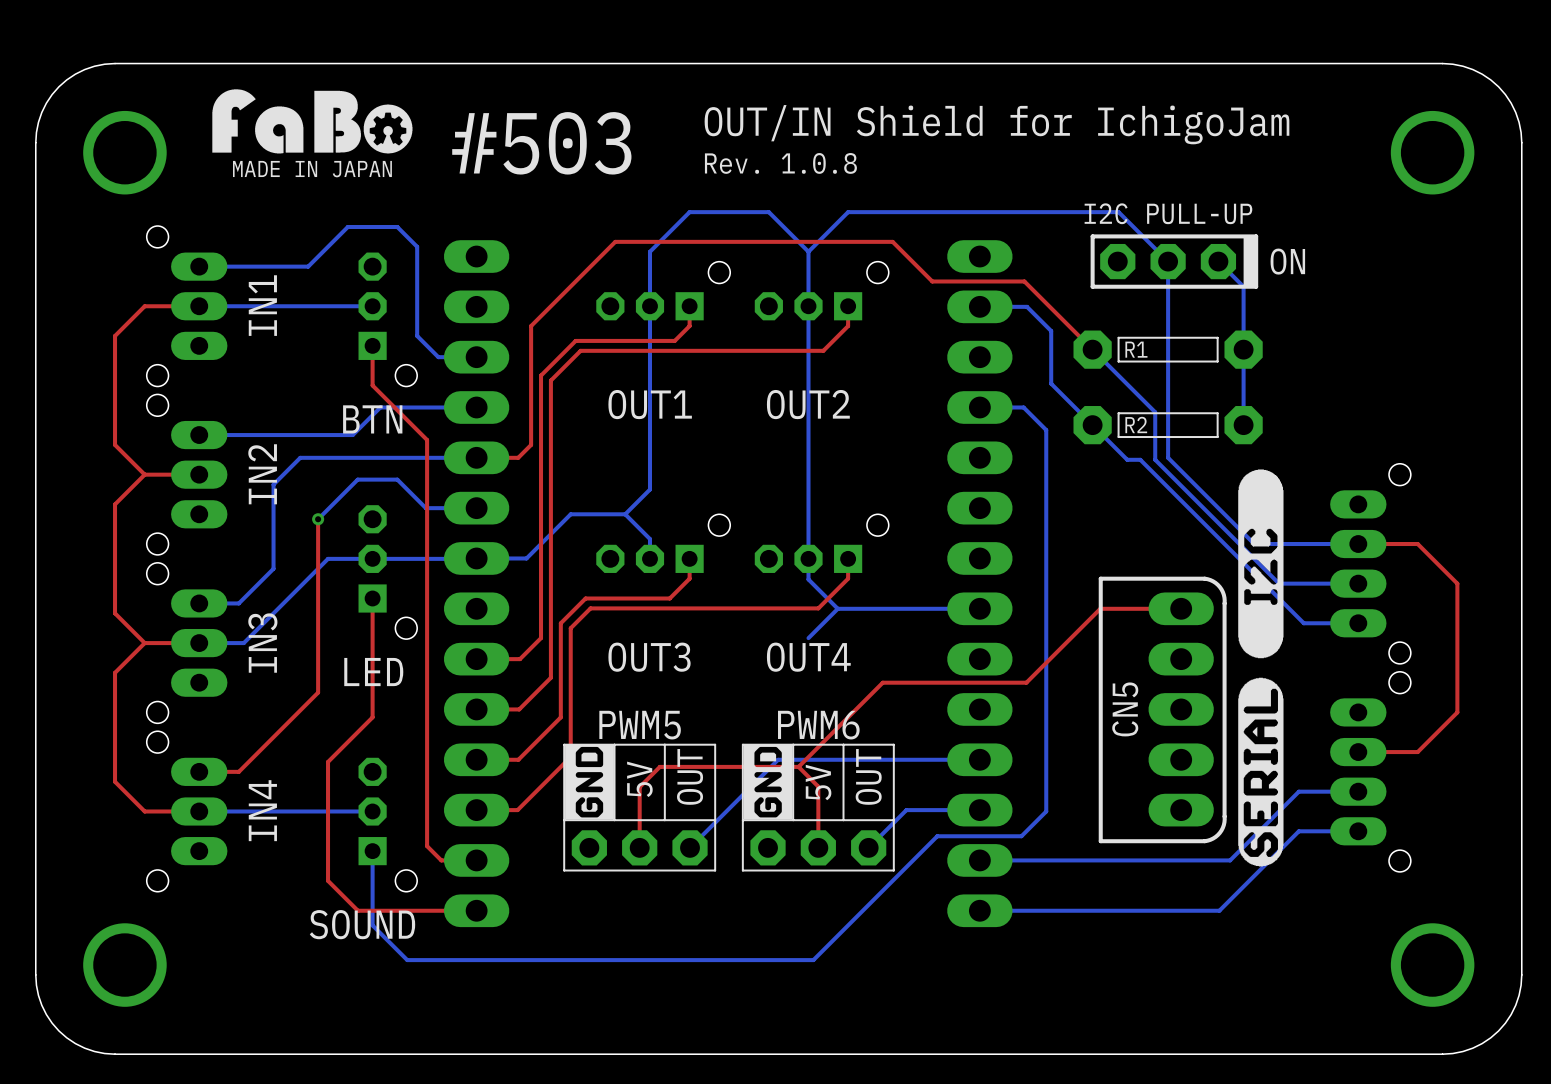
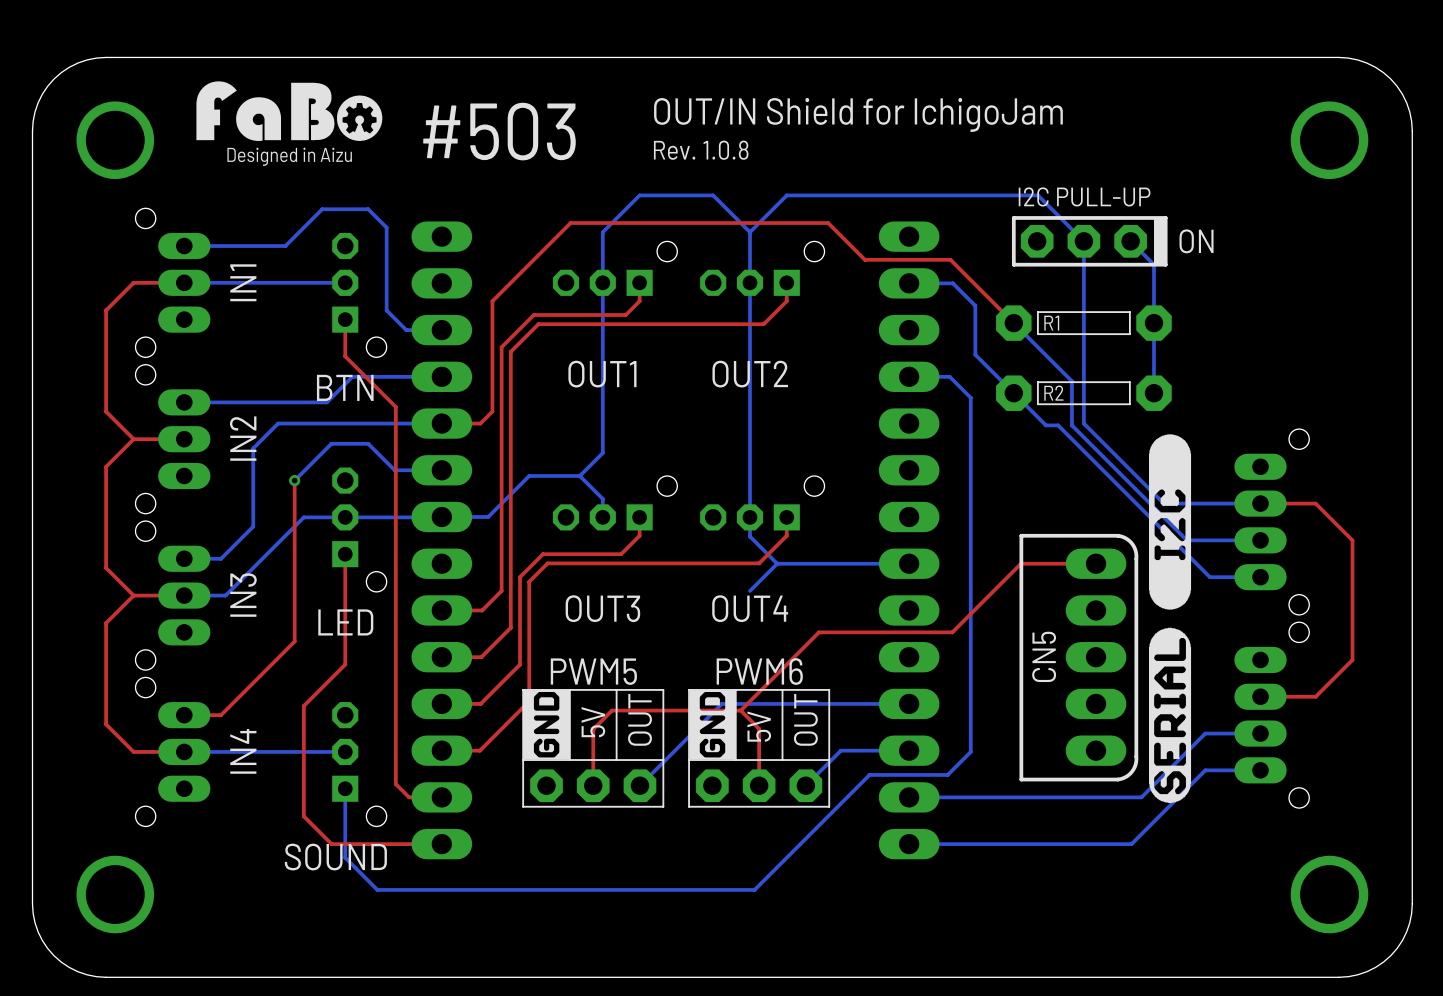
text: MADE IN JAPAN (312, 169) -> Designed in Aizu (289, 156)

